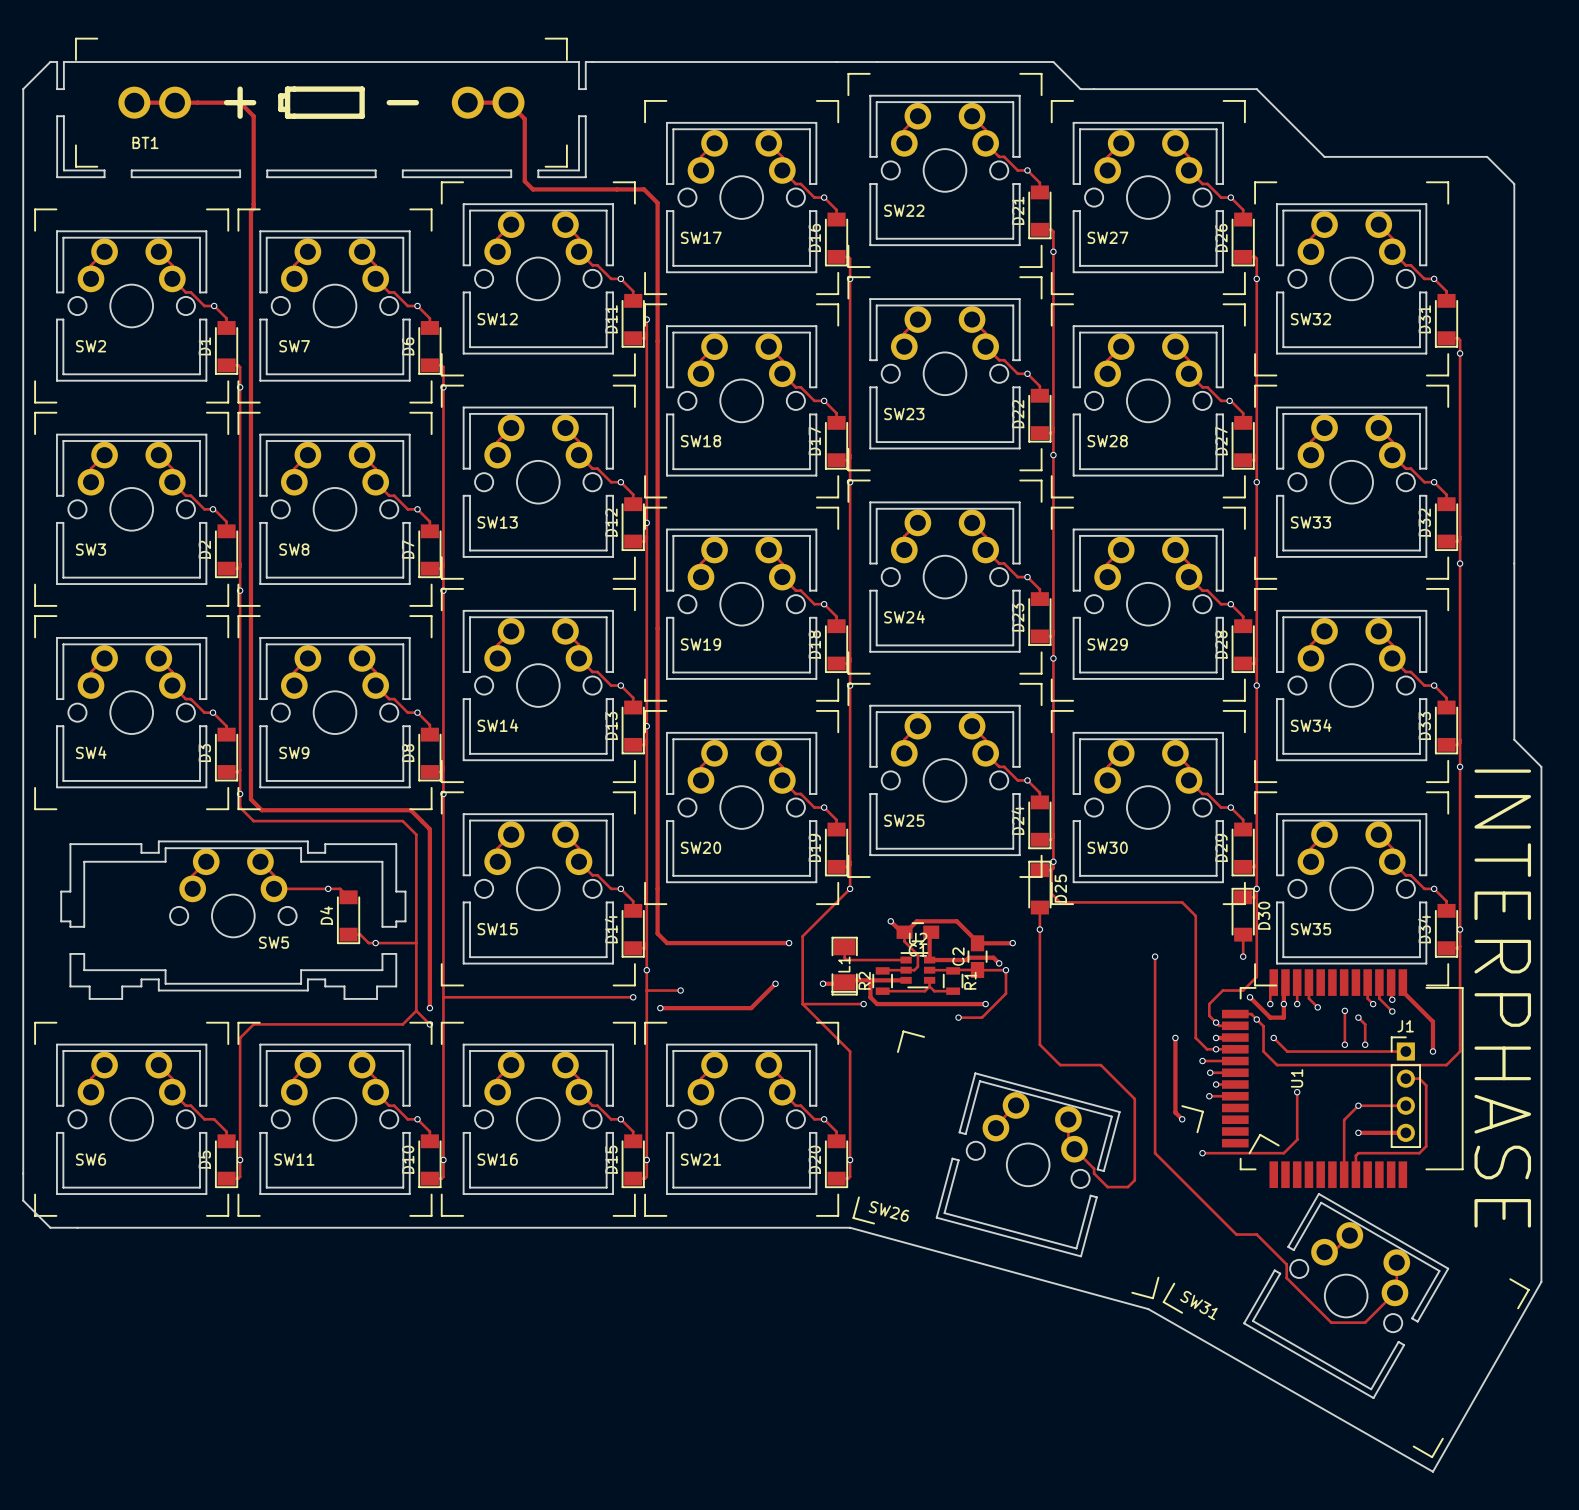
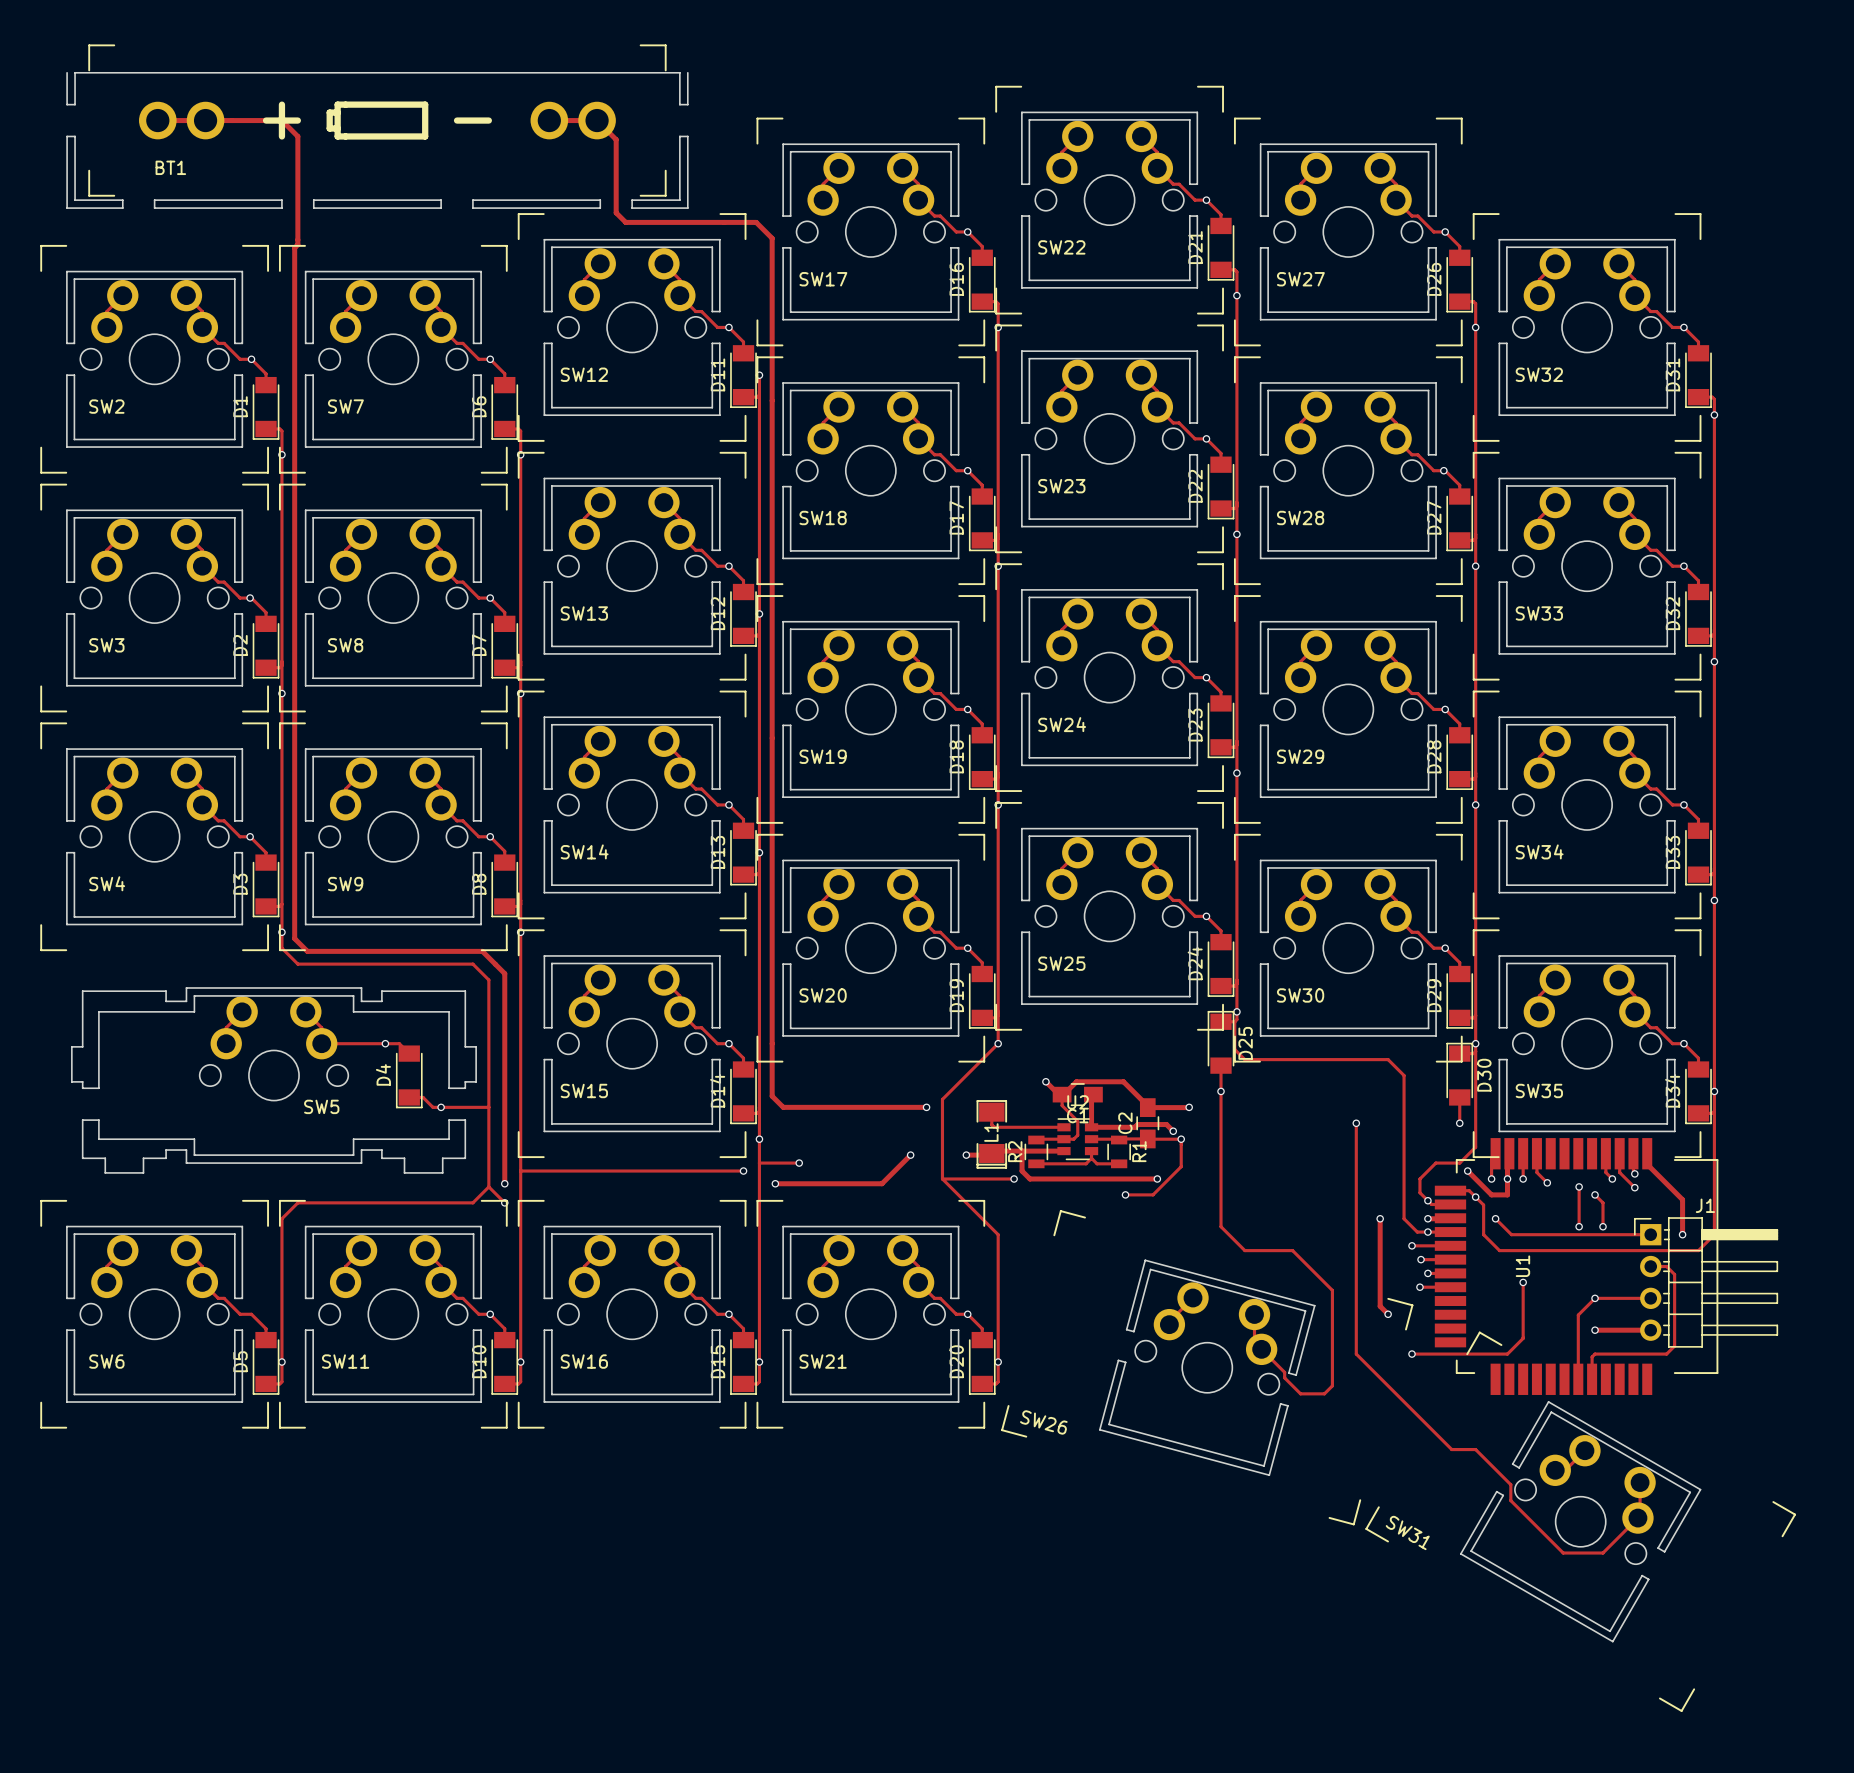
board edge: (57, 62) (50, 62) (23, 89) (23, 1200) (50, 1227) (850, 1227) (1148, 1309) (1432, 1471) (1541, 1281) (1541, 766) (1514, 739) (1514, 184) (1487, 156) (1324, 156) (1256, 89) (1080, 89) (1053, 62) (585, 62) -> none
text: INTERPHASE (1502, 998) -> none
J1 footprint: [1391, 1036, 1421, 1148] -> [1634, 1217, 1779, 1348]

